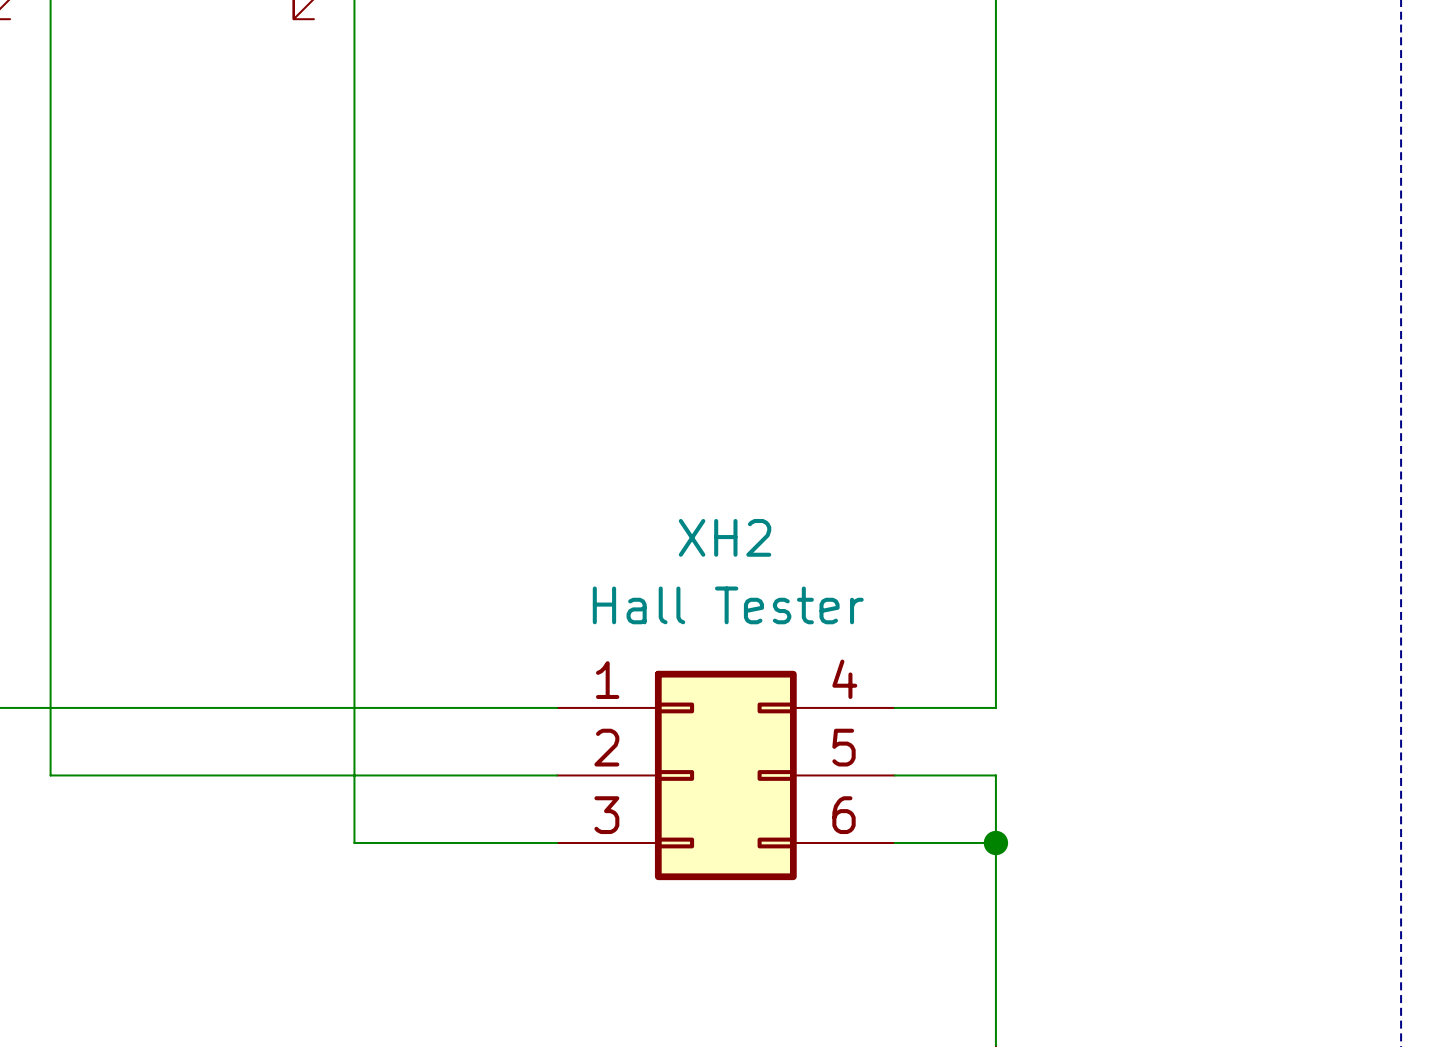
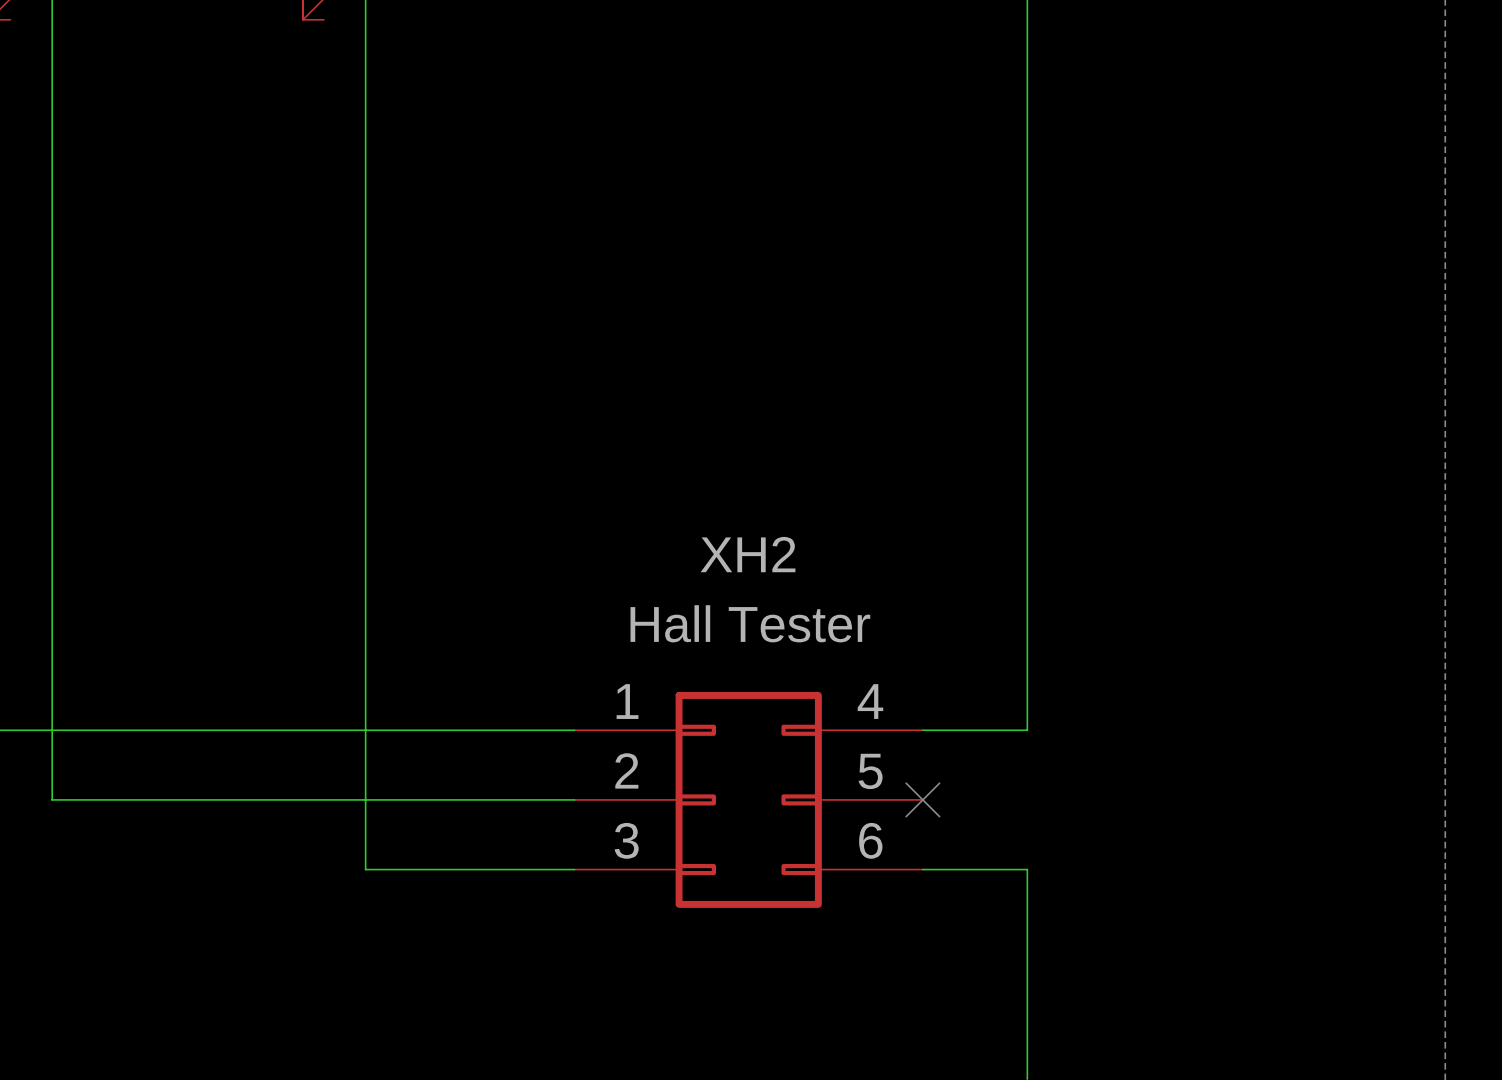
wire: (894, 775) (995, 775) (995, 842) -> none
no-connect mark: none -> (922, 799)
junction: (995, 842) -> none

